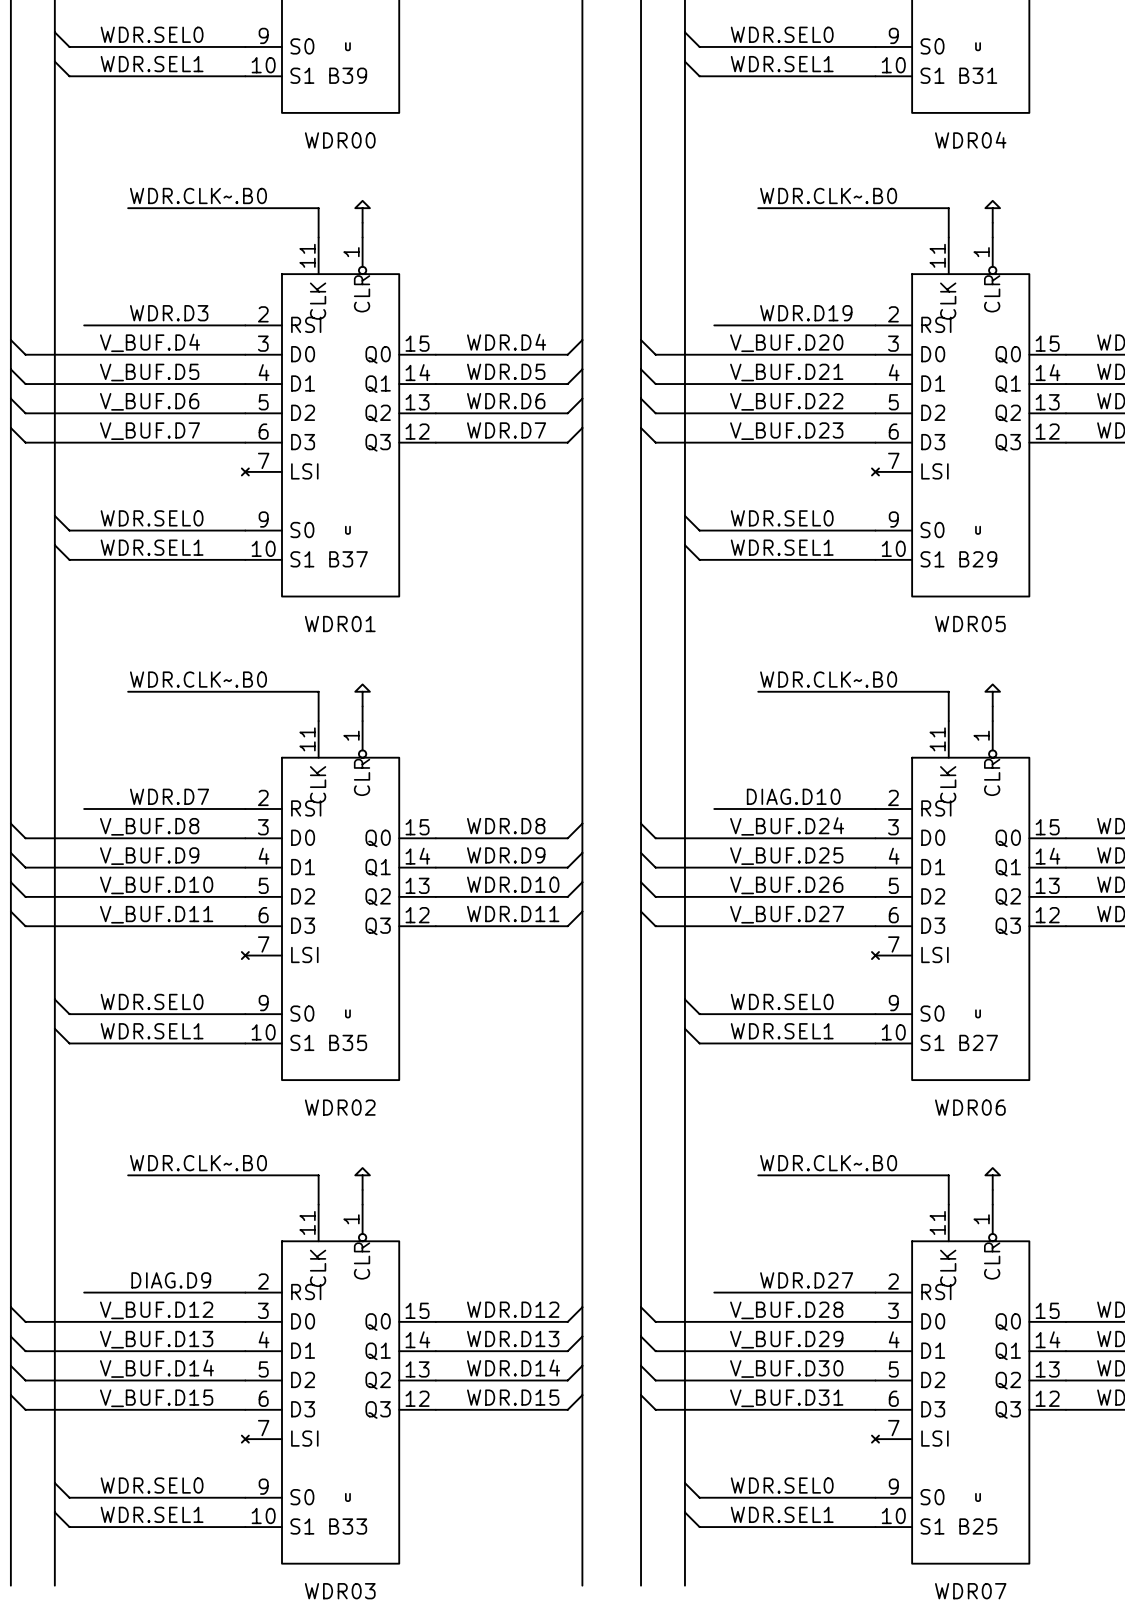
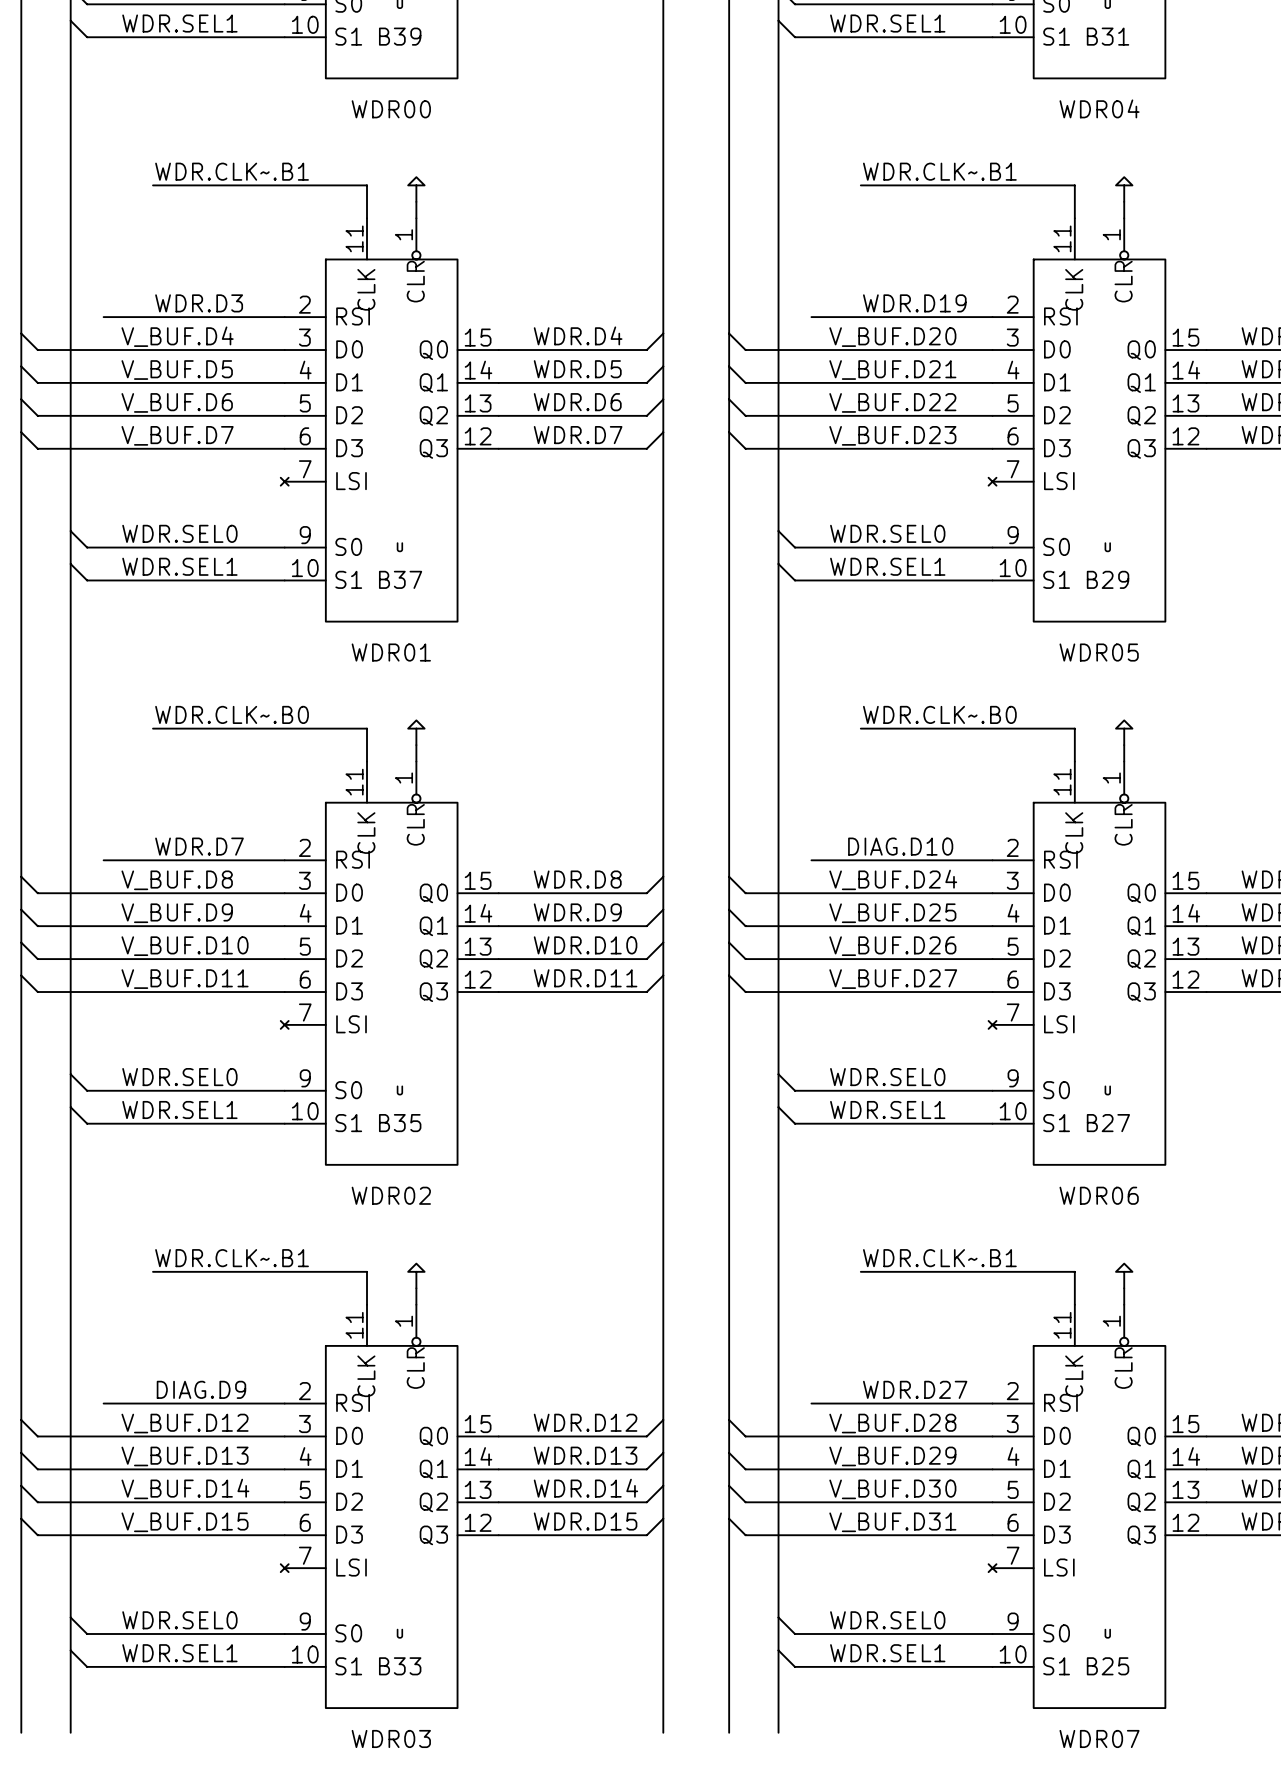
label: WDR.CLK~.B0 (198, 195) -> WDR.CLK~.B1 (232, 171)
label: WDR.CLK~.B0 (828, 195) -> WDR.CLK~.B1 (939, 171)
label: WDR.CLK~.B0 (198, 1163) -> WDR.CLK~.B1 (232, 1258)
label: WDR.CLK~.B0 (828, 1163) -> WDR.CLK~.B1 (939, 1258)

